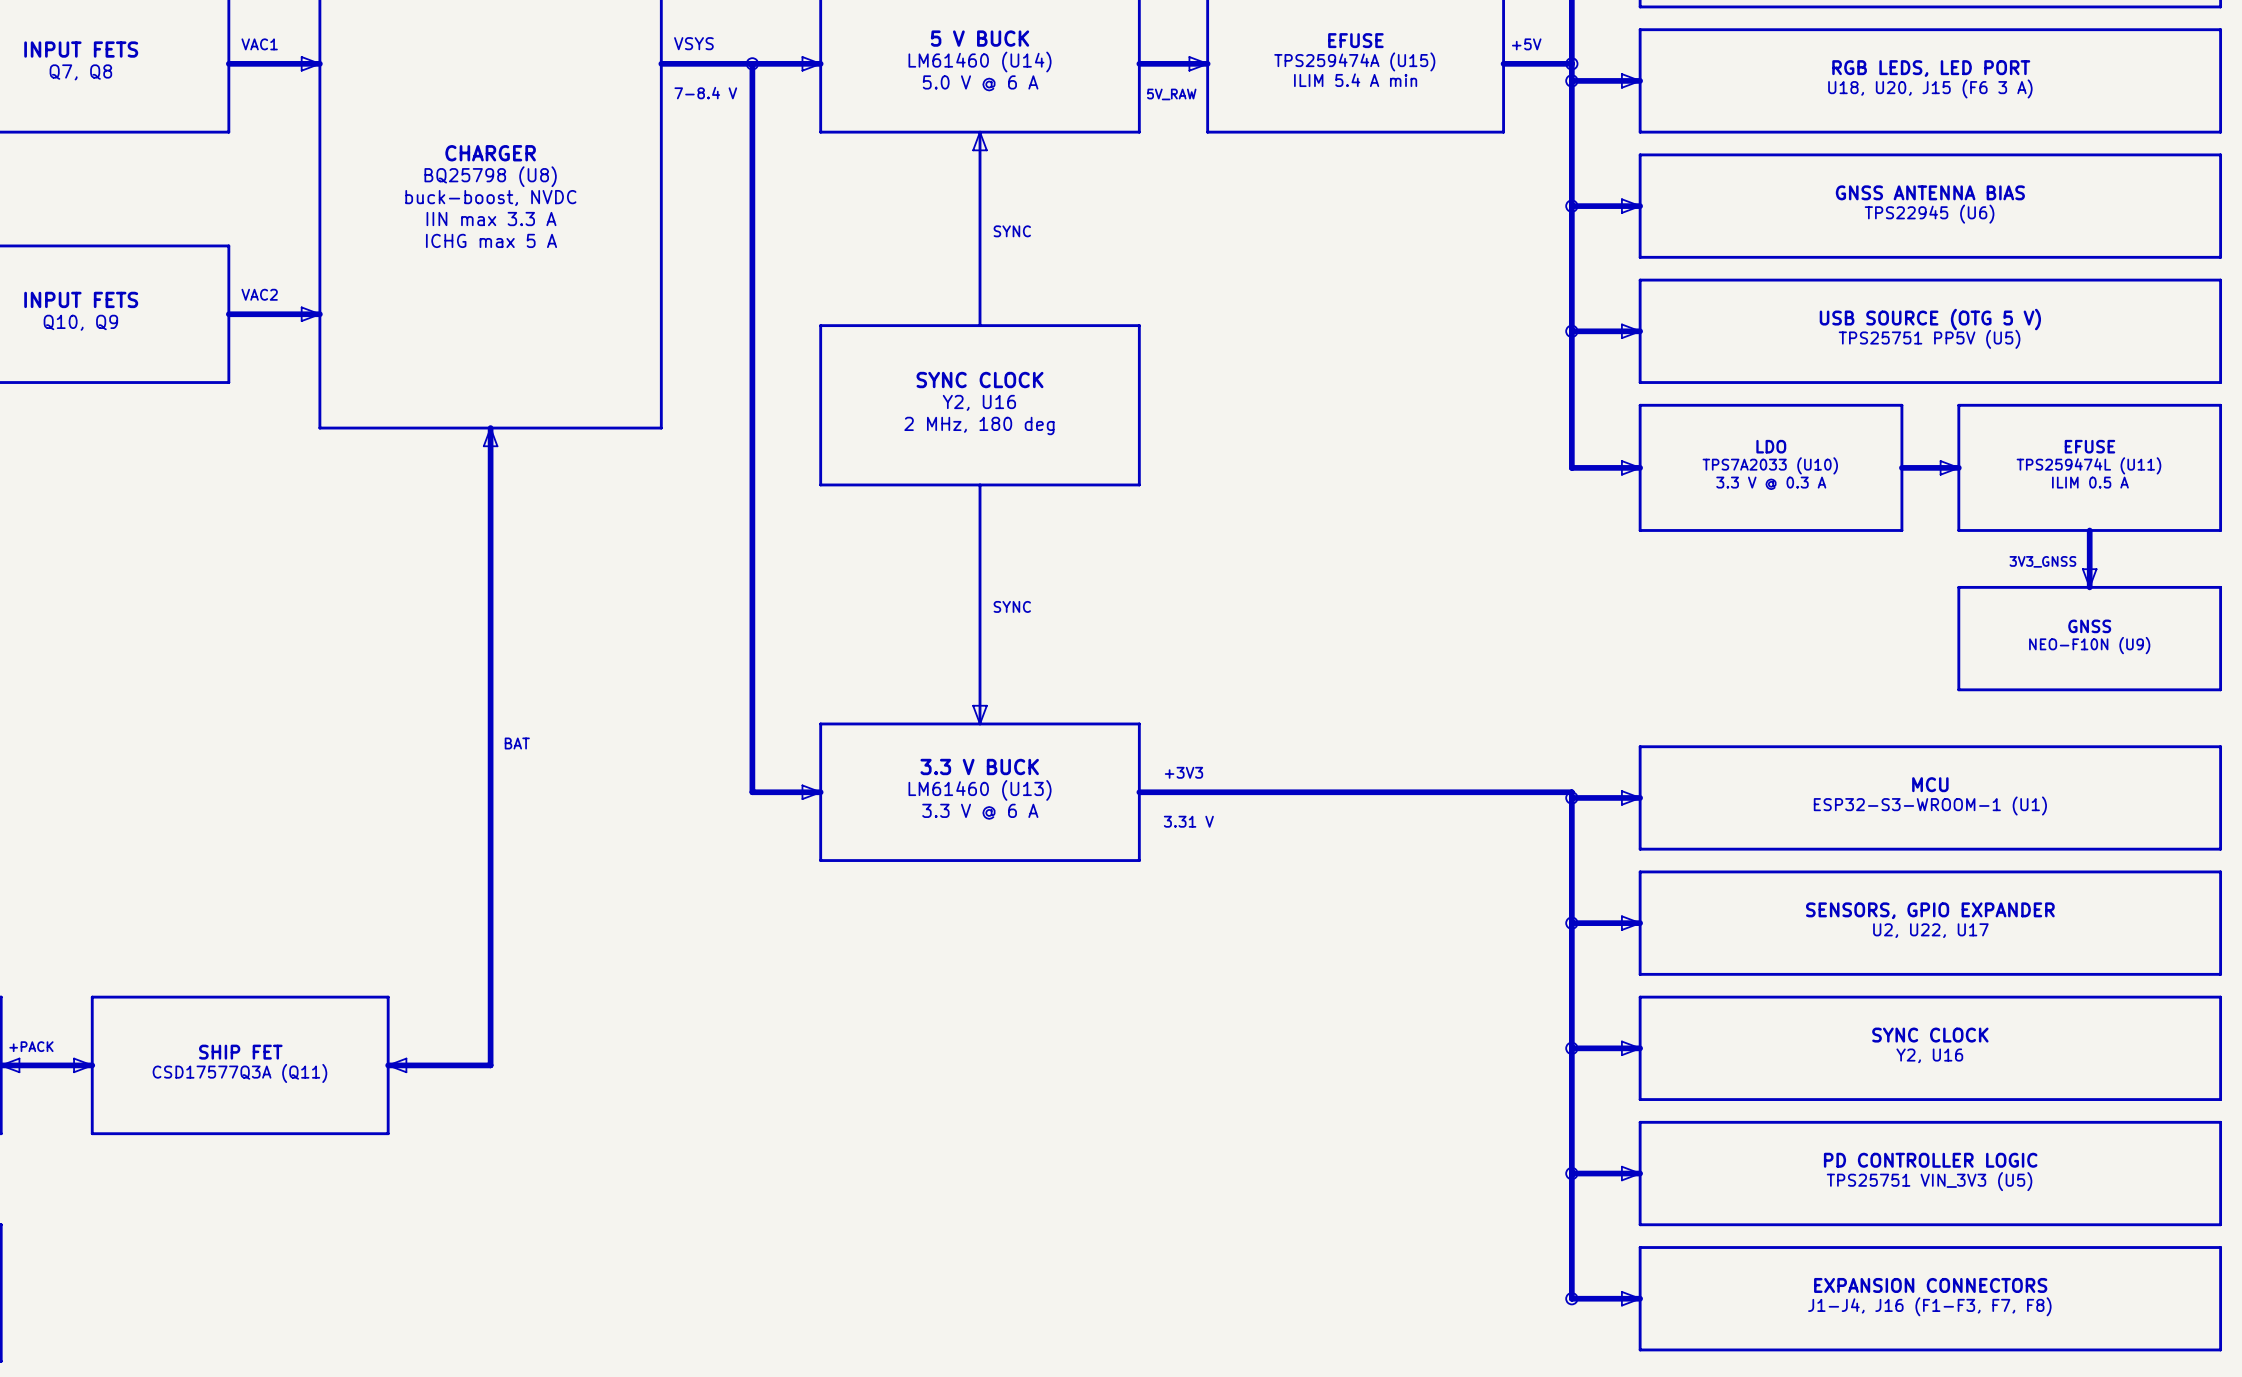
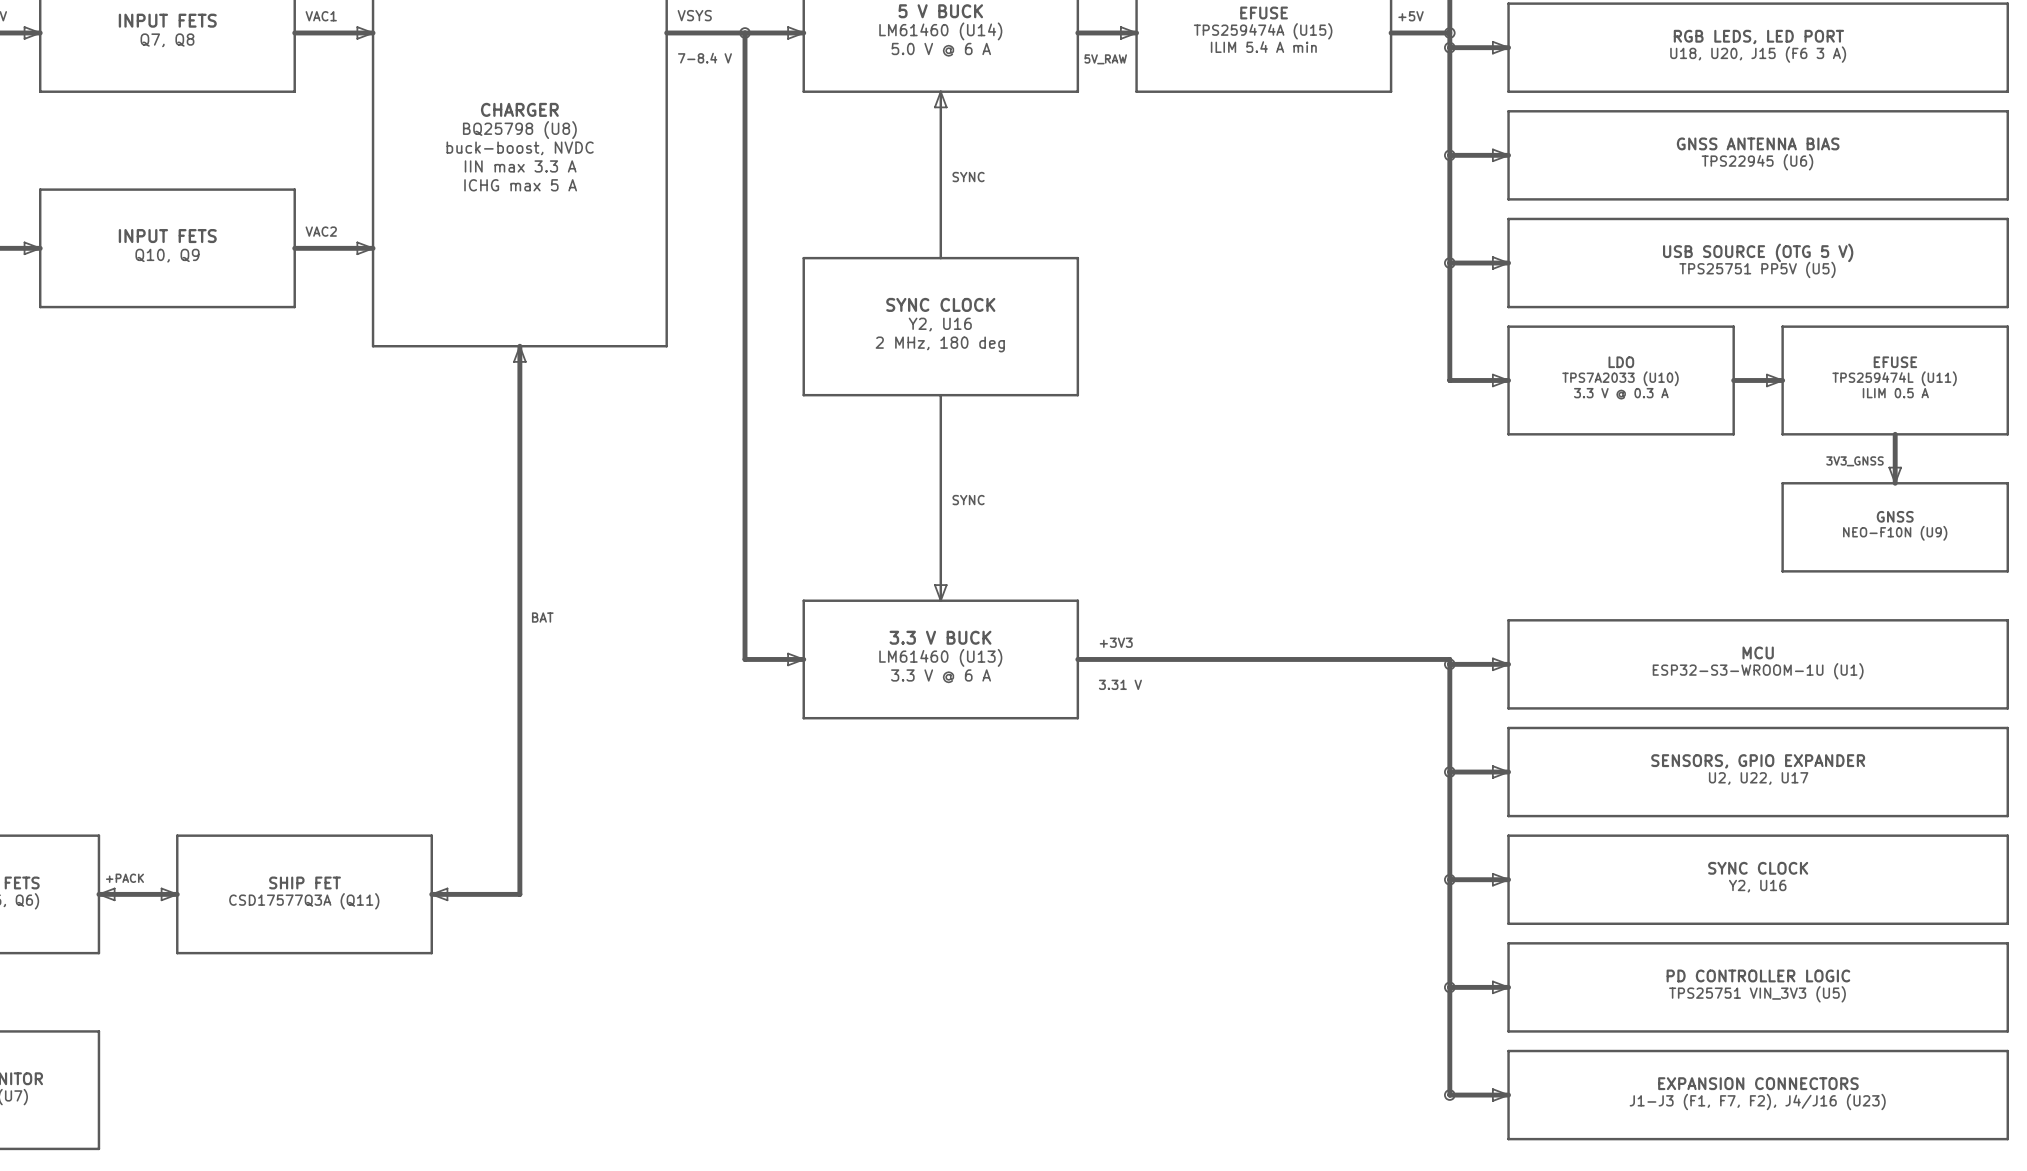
text: ESP32-S3-WROOM-1 (U1) (1930, 805) -> ESP32-S3-WROOM-1U (U1) (1758, 671)
text: J1-J4, J16 (F1-F3, F7, F8) (1929, 1306) -> J1-J3 (F1, F7, F2), J4/J16 (U23) (1757, 1101)

